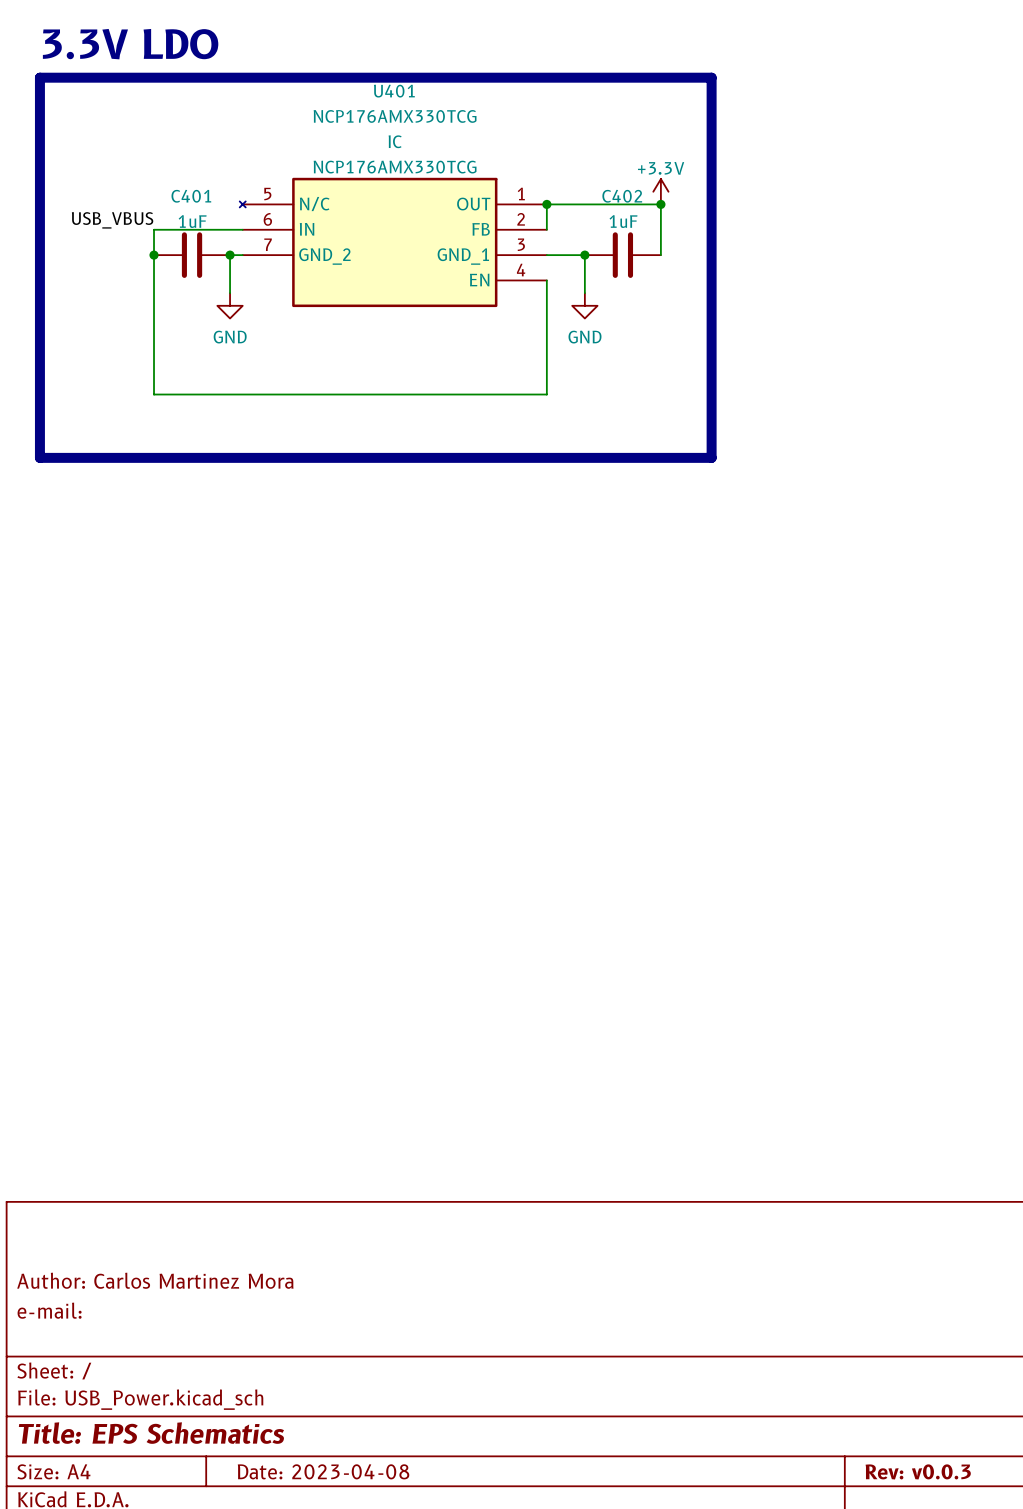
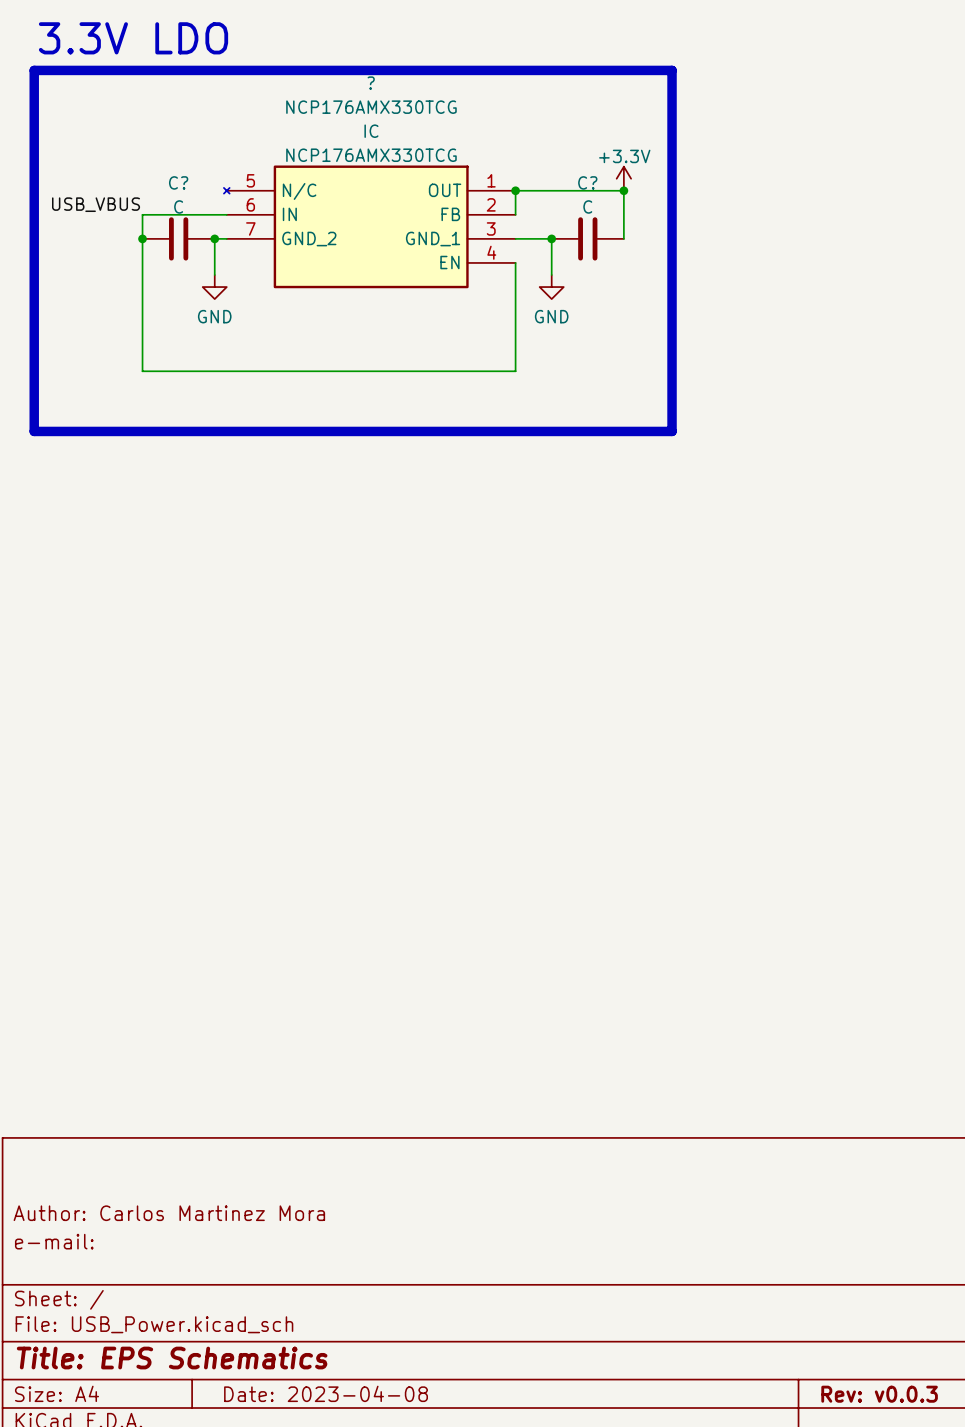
U401 name: U401 (394, 91) -> ? (371, 83)
C401 name: C401 (191, 196) -> C? (178, 182)
C402 name: C402 (622, 196) -> C? (587, 182)
C401 value: 1uF (192, 221) -> C (178, 206)
C402 value: 1uF (623, 221) -> C (587, 206)

